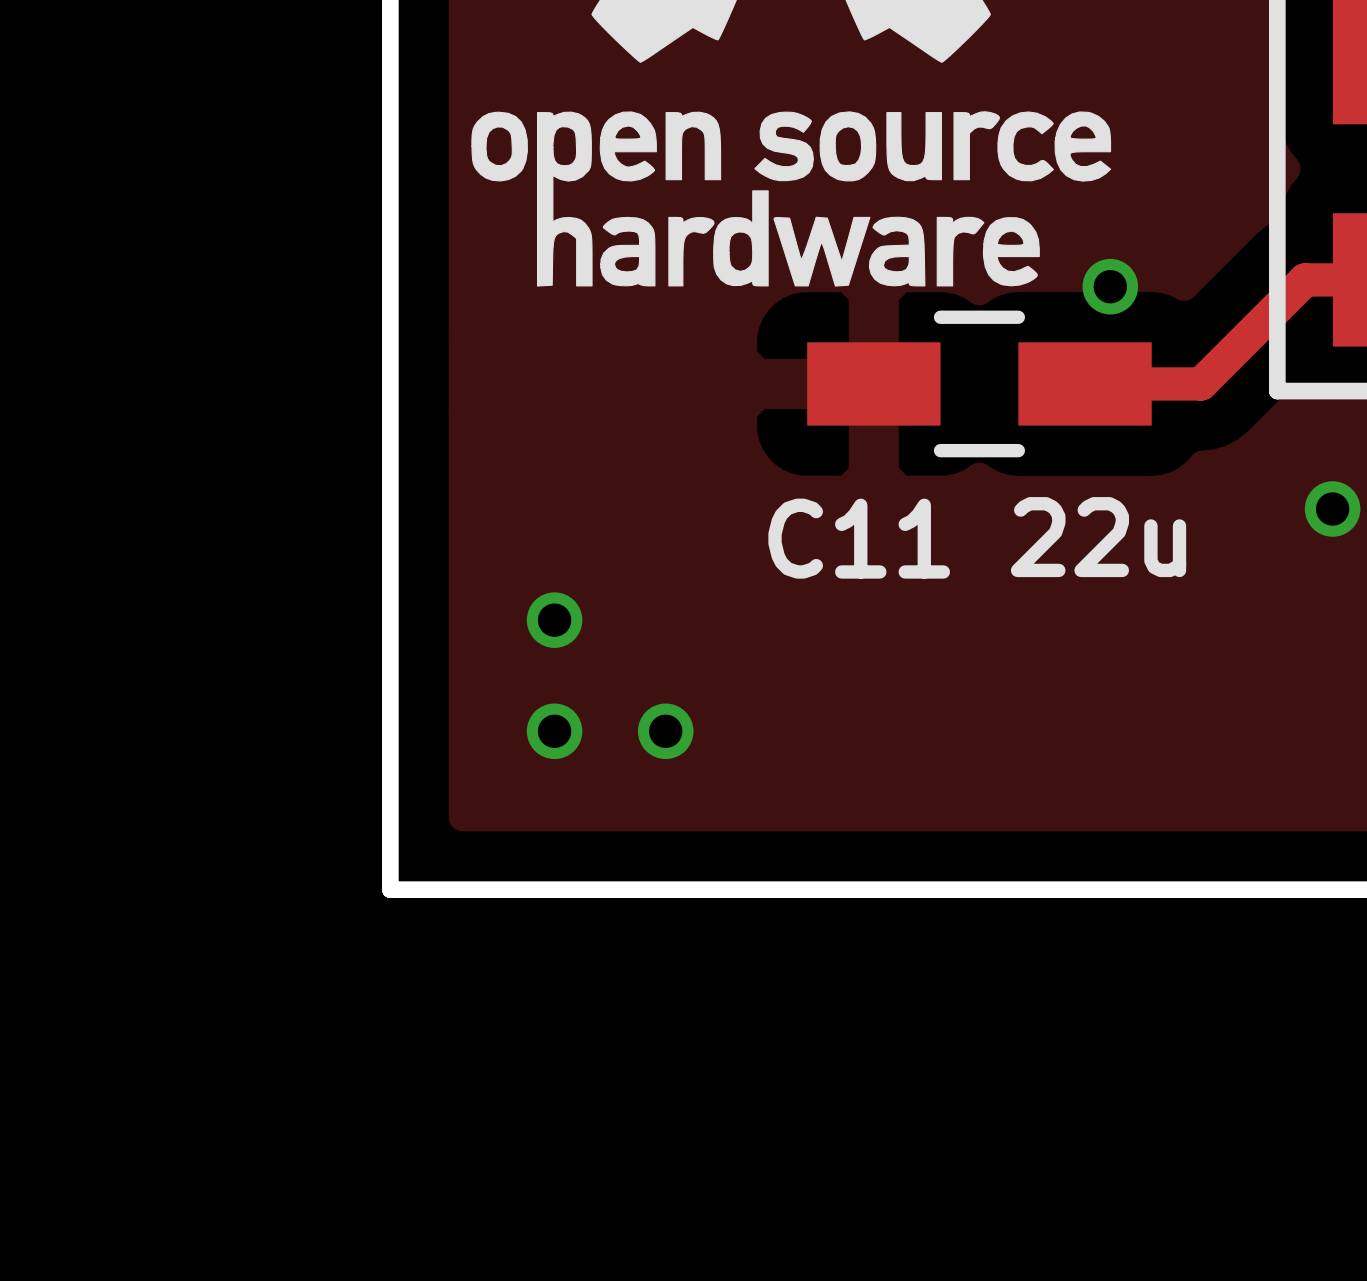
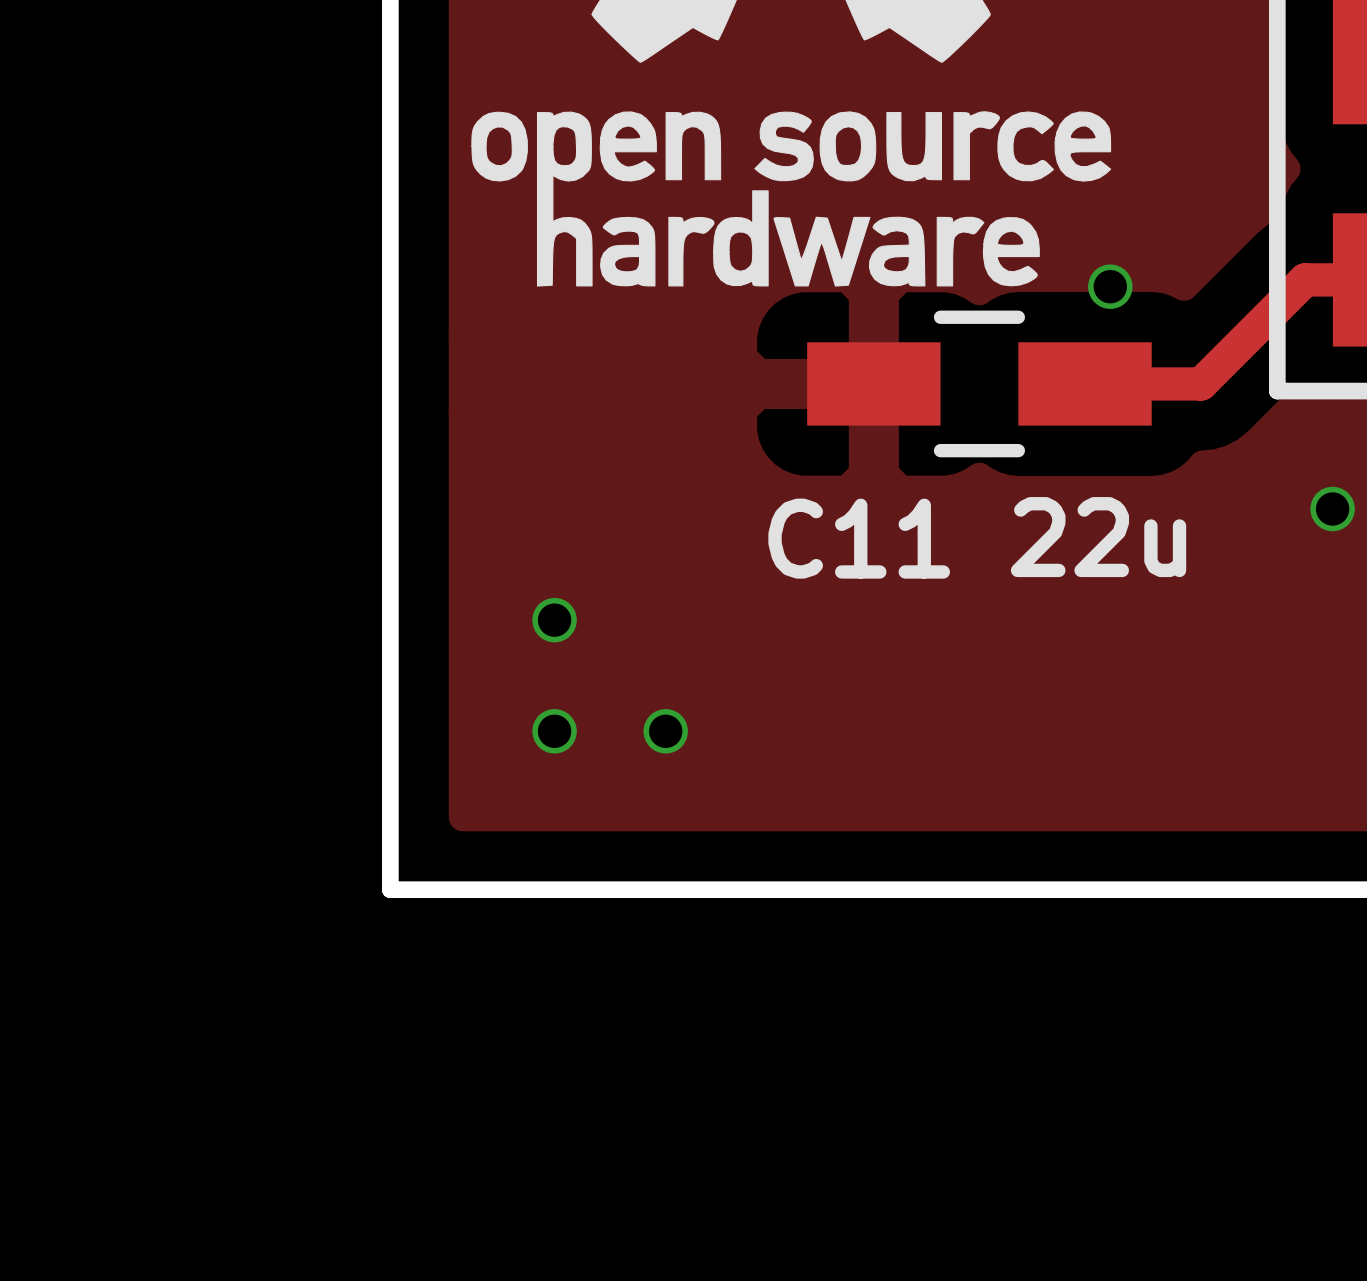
part footprint: [1082, 258, 1139, 315] -> [1088, 264, 1133, 309]
part footprint: [1304, 481, 1361, 537] -> [1310, 486, 1355, 532]
part footprint: [526, 592, 583, 648] -> [532, 597, 577, 643]
part footprint: [526, 703, 583, 760] -> [532, 709, 577, 754]
part footprint: [637, 703, 694, 760] -> [643, 709, 688, 754]

